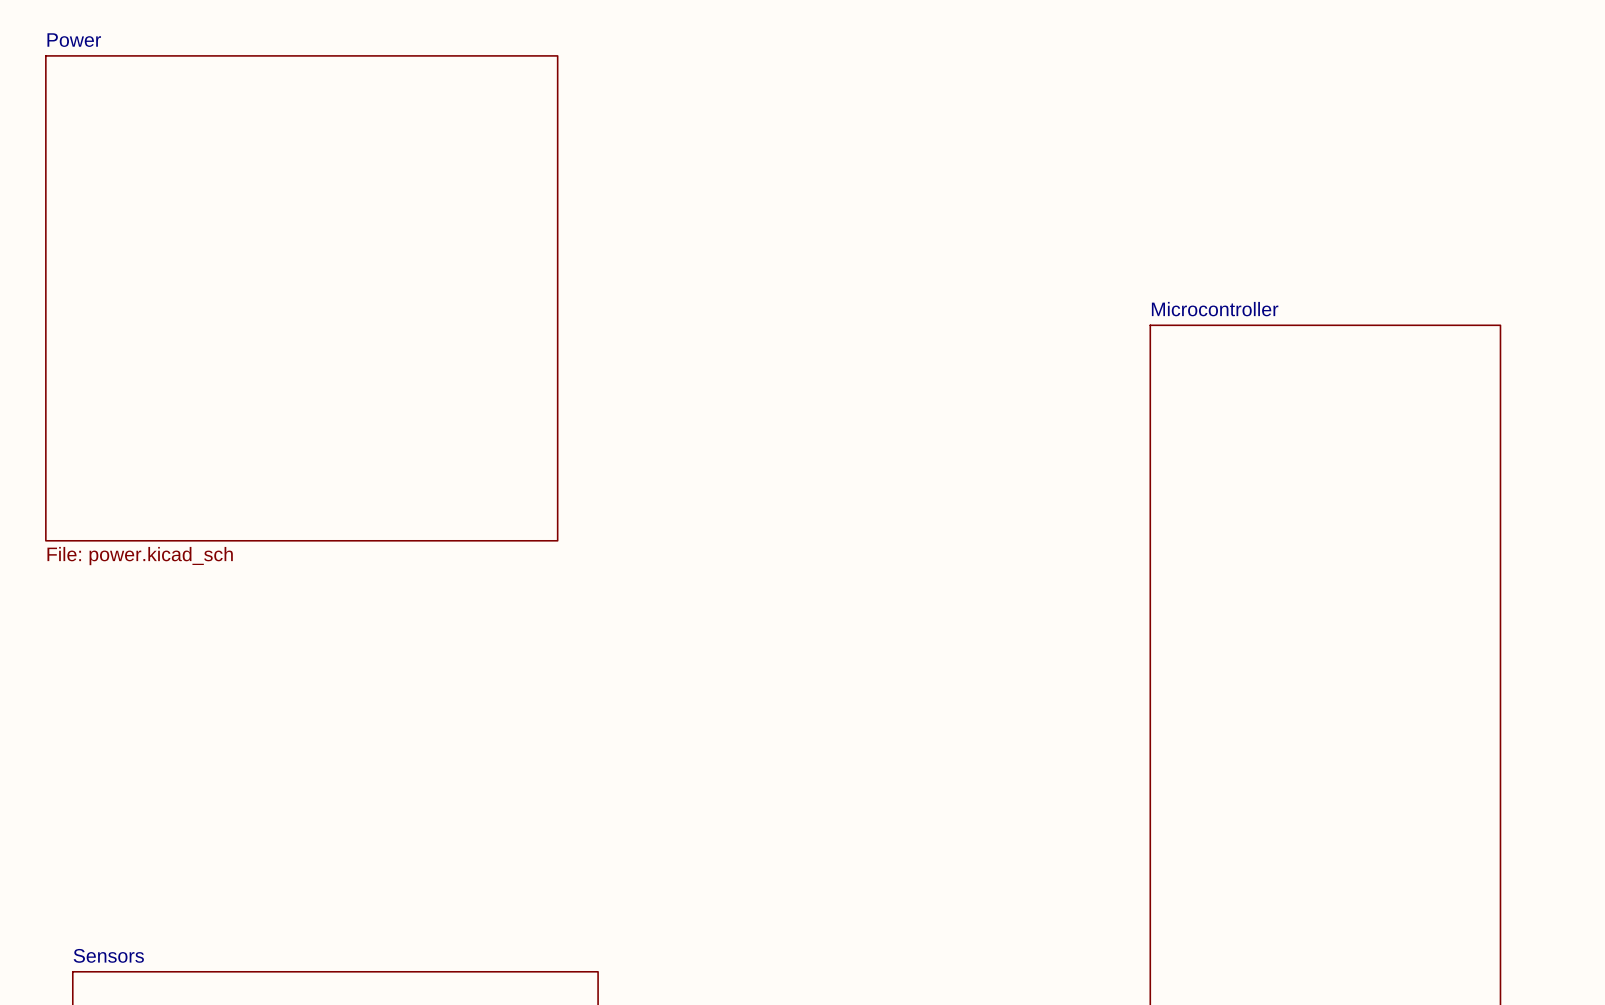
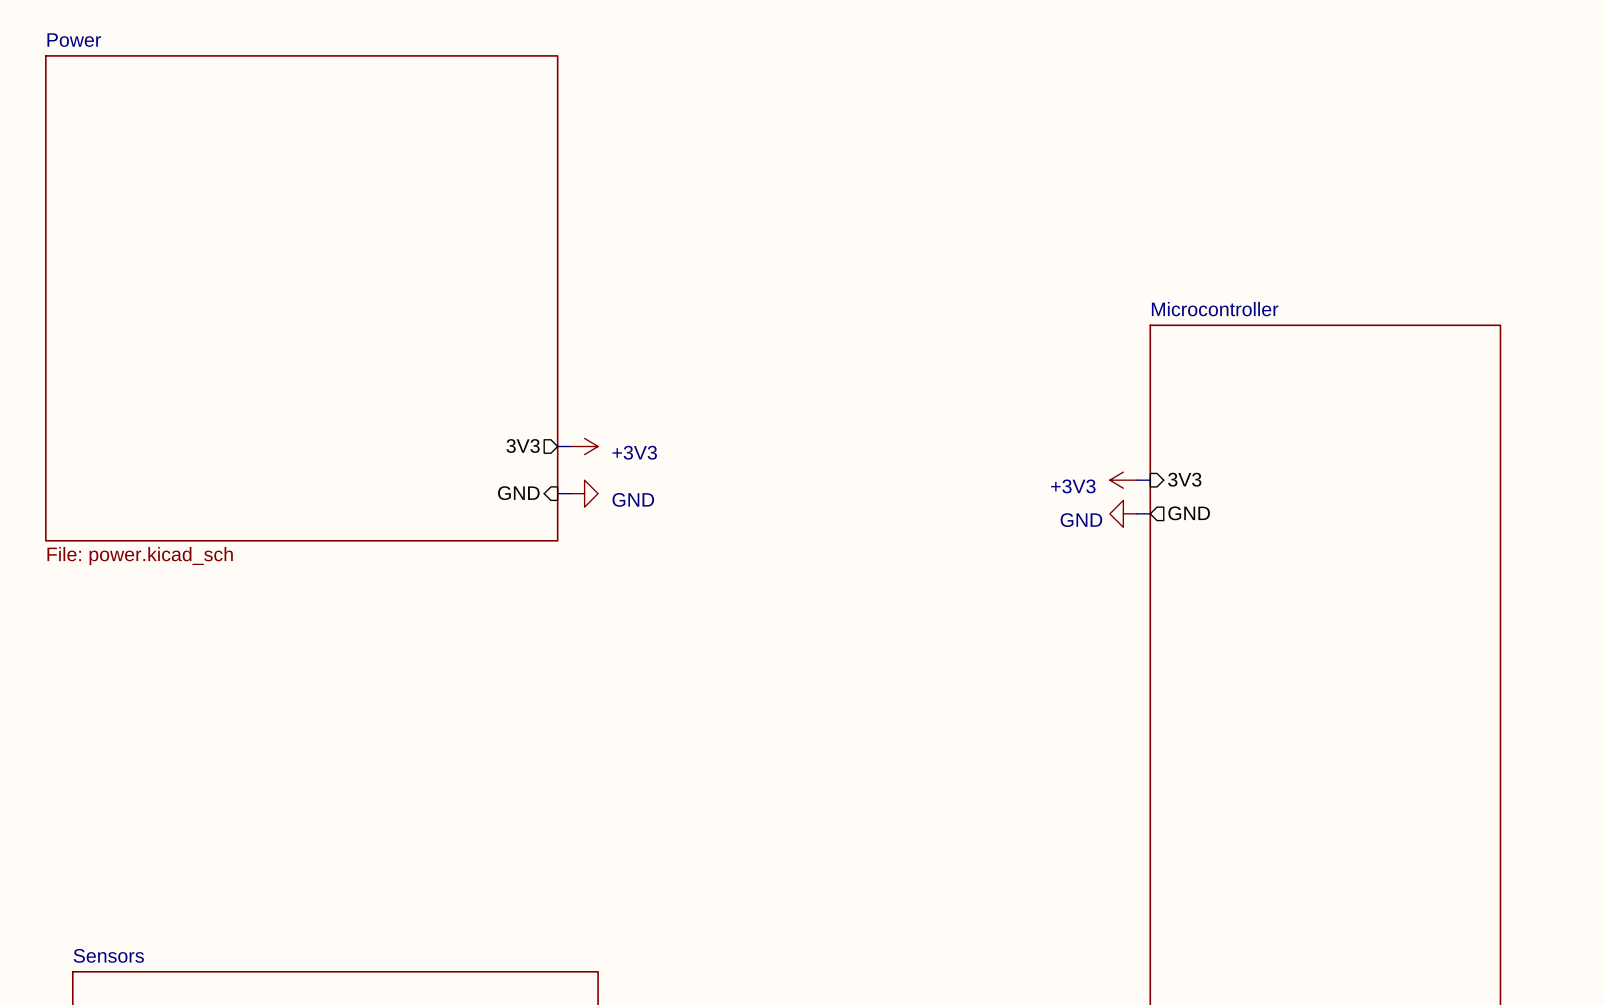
sheet pin: none -> 3V3 (523, 446)
wire: none -> (557, 446) (571, 446)
power symbol: none -> +3V3 (584, 446)
sheet pin: none -> 3V3 (1184, 479)
power symbol: none -> +3V3 (1123, 480)
wire: none -> (1136, 480) (1150, 480)
sheet pin: none -> GND (518, 493)
wire: none -> (557, 493) (571, 493)
power symbol: none -> GND (584, 493)
power symbol: none -> GND (1123, 513)
wire: none -> (1136, 513) (1150, 513)
sheet pin: none -> GND (1189, 513)

